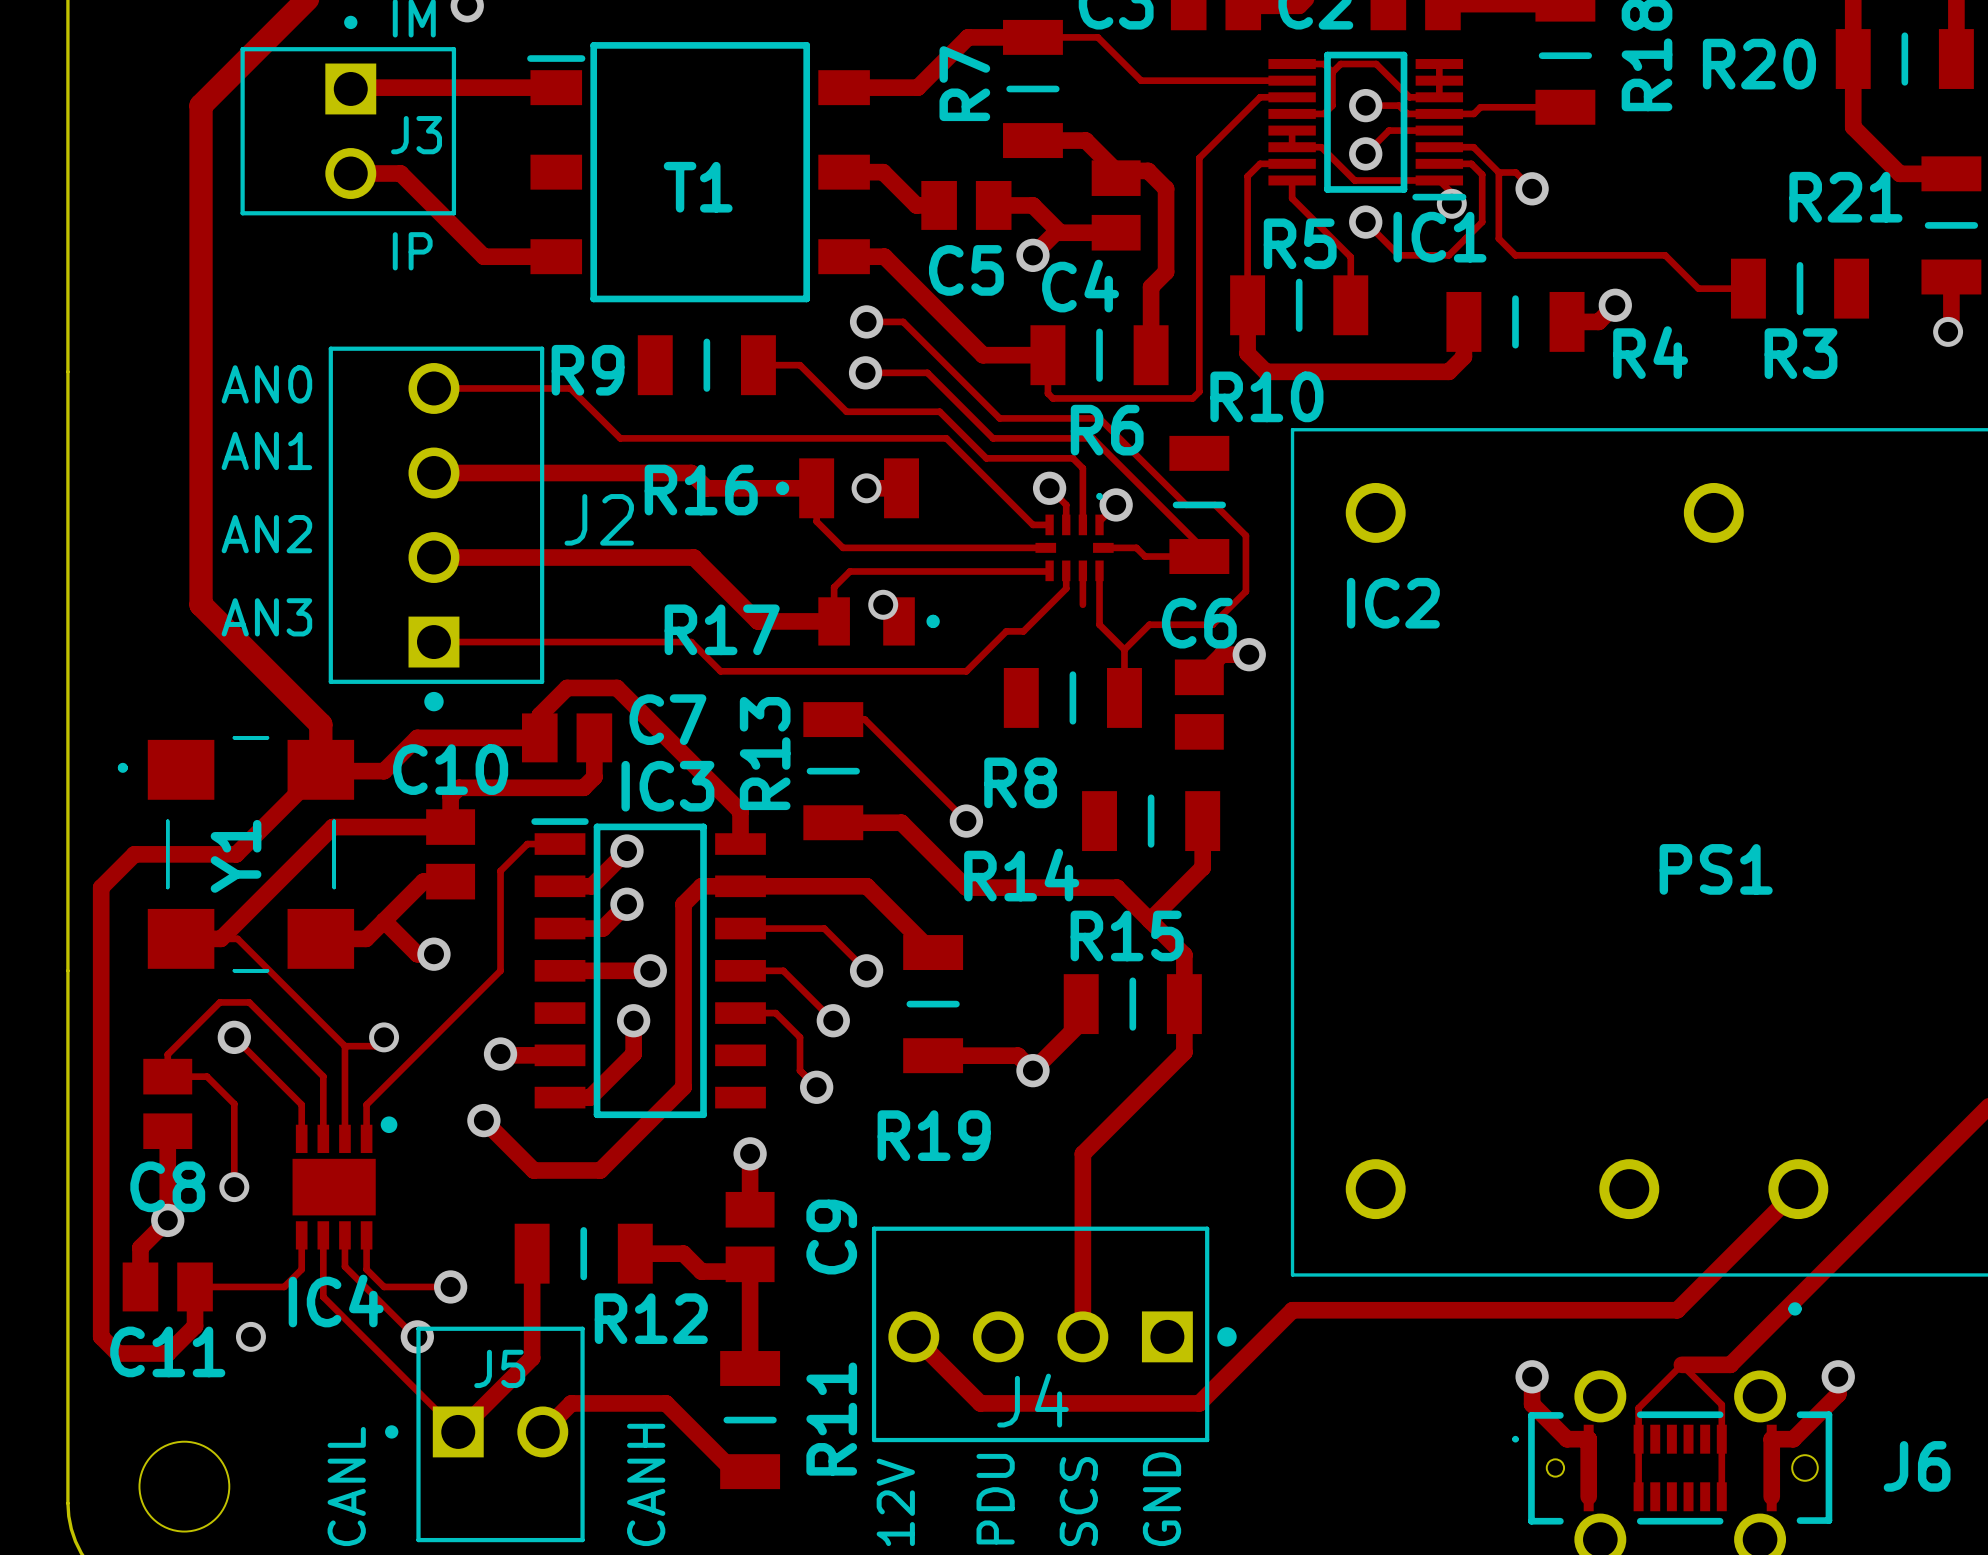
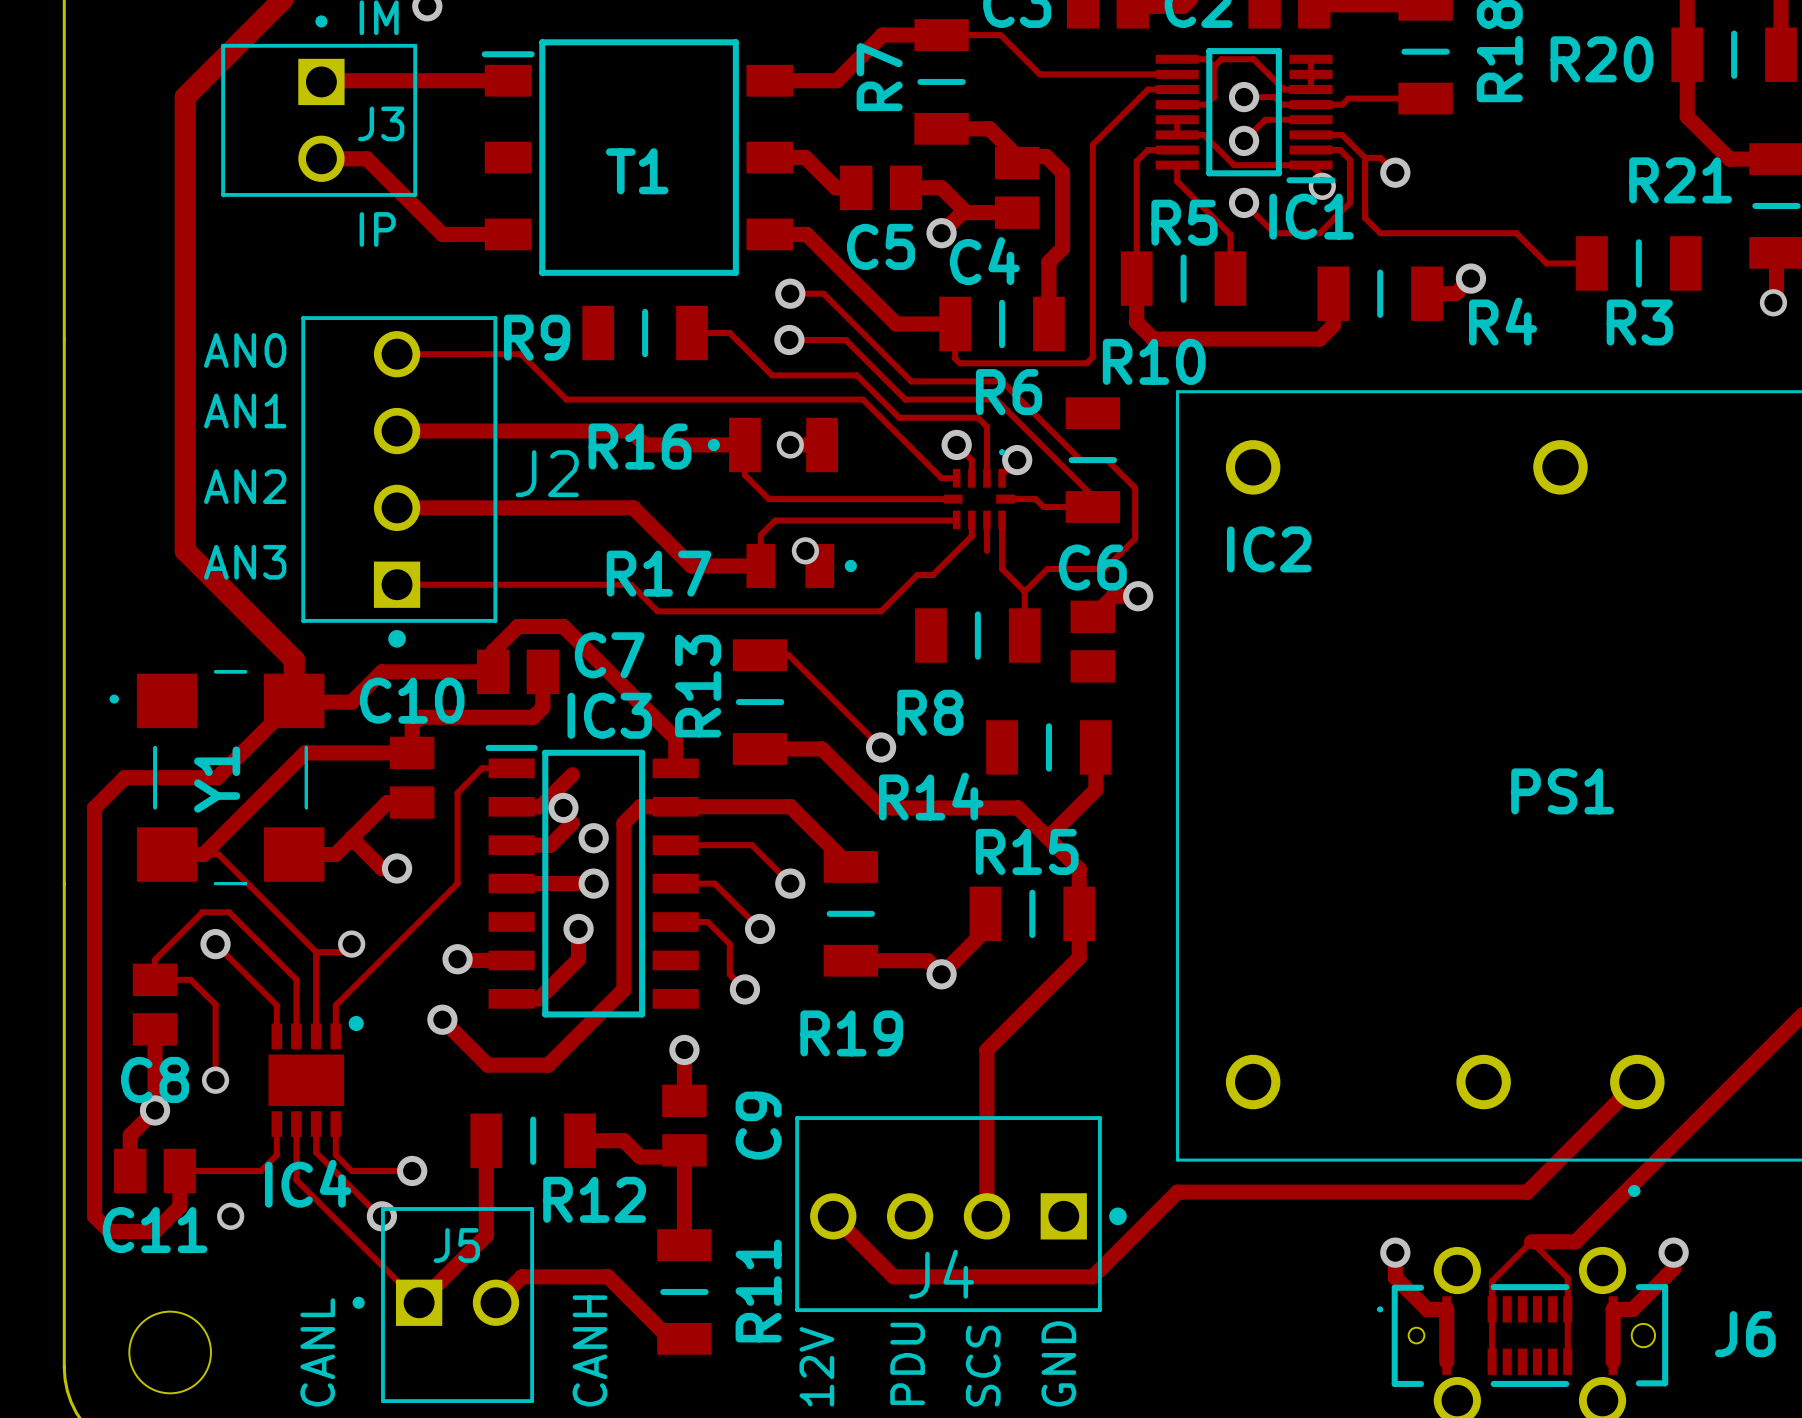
via: (626, 851) -> none
via: none -> (563, 807)
via: (626, 904) -> none
via: none -> (593, 838)

